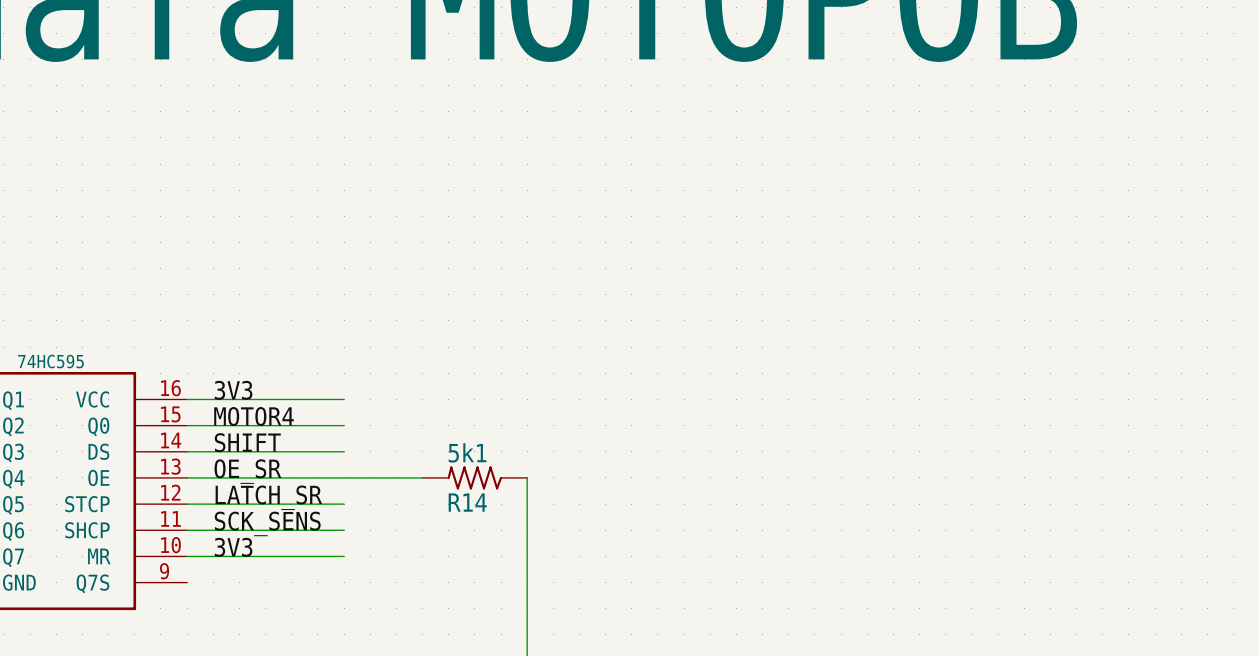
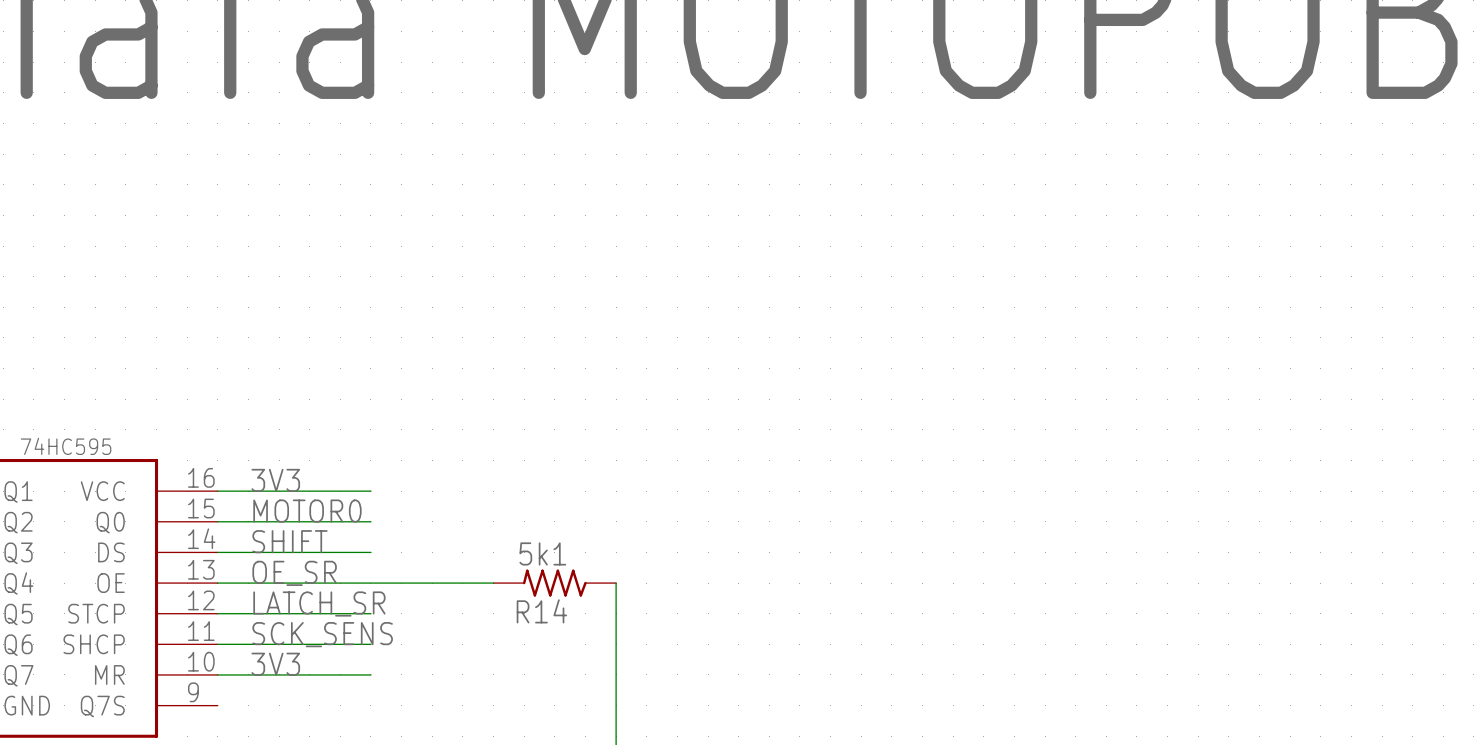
wire: (317, 399) (344, 399) -> none
label: MOTOR4 (254, 416) -> MOTOR0 (307, 511)
wire: (317, 425) (344, 425) -> none
wire: (317, 451) (344, 451) -> none
wire: (317, 504) (344, 504) -> none
wire: (317, 530) (344, 530) -> none
wire: (317, 556) (344, 556) -> none

